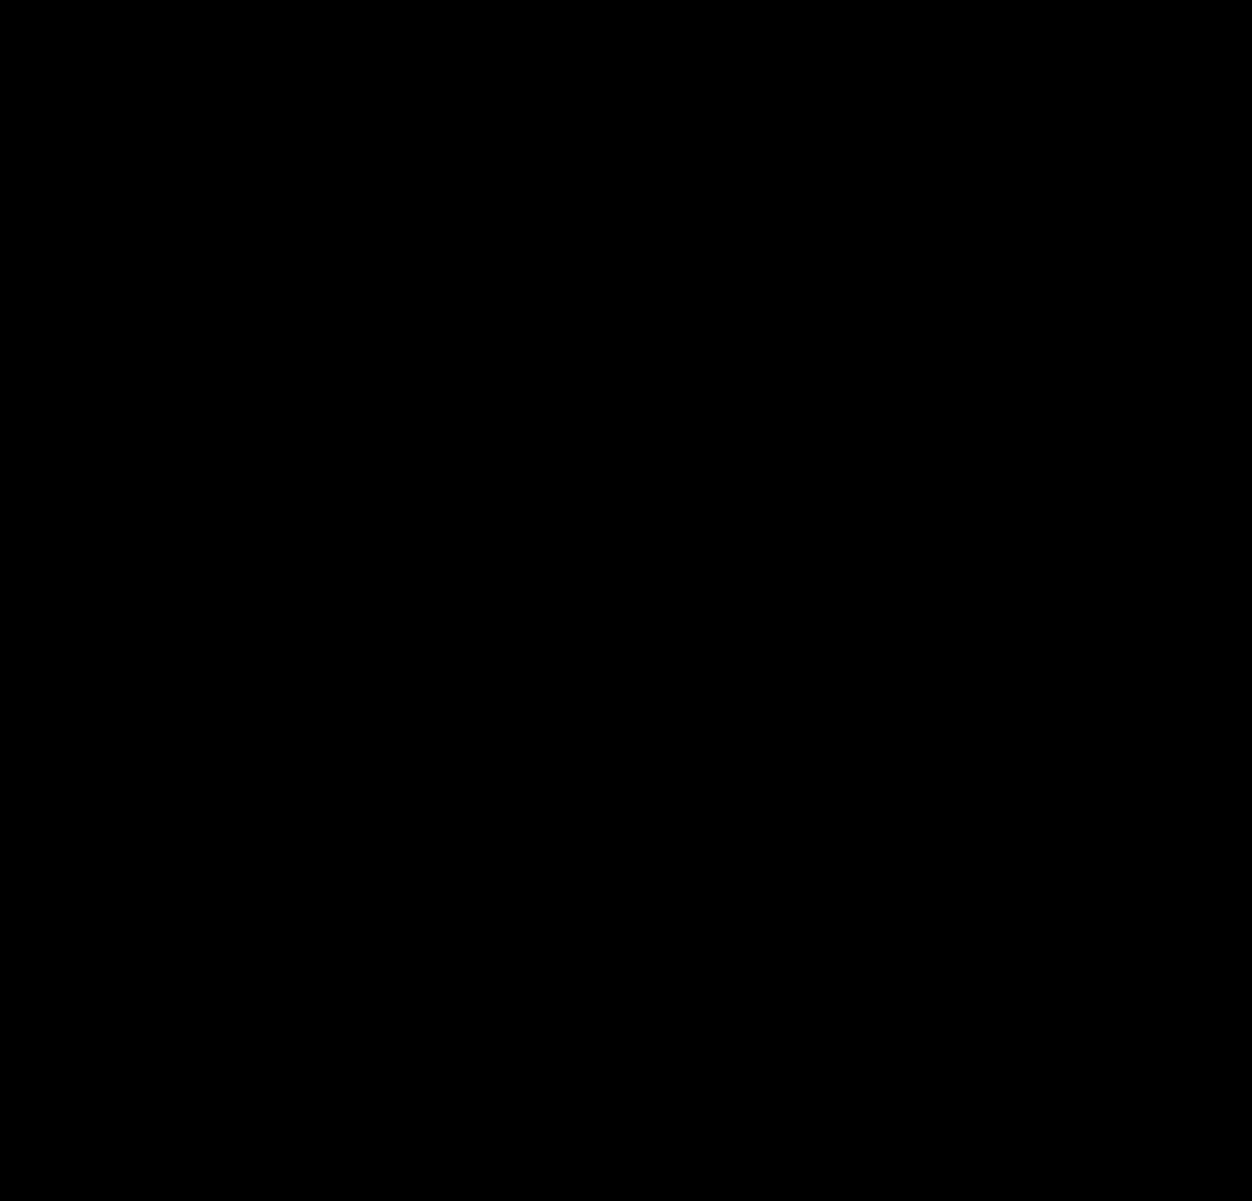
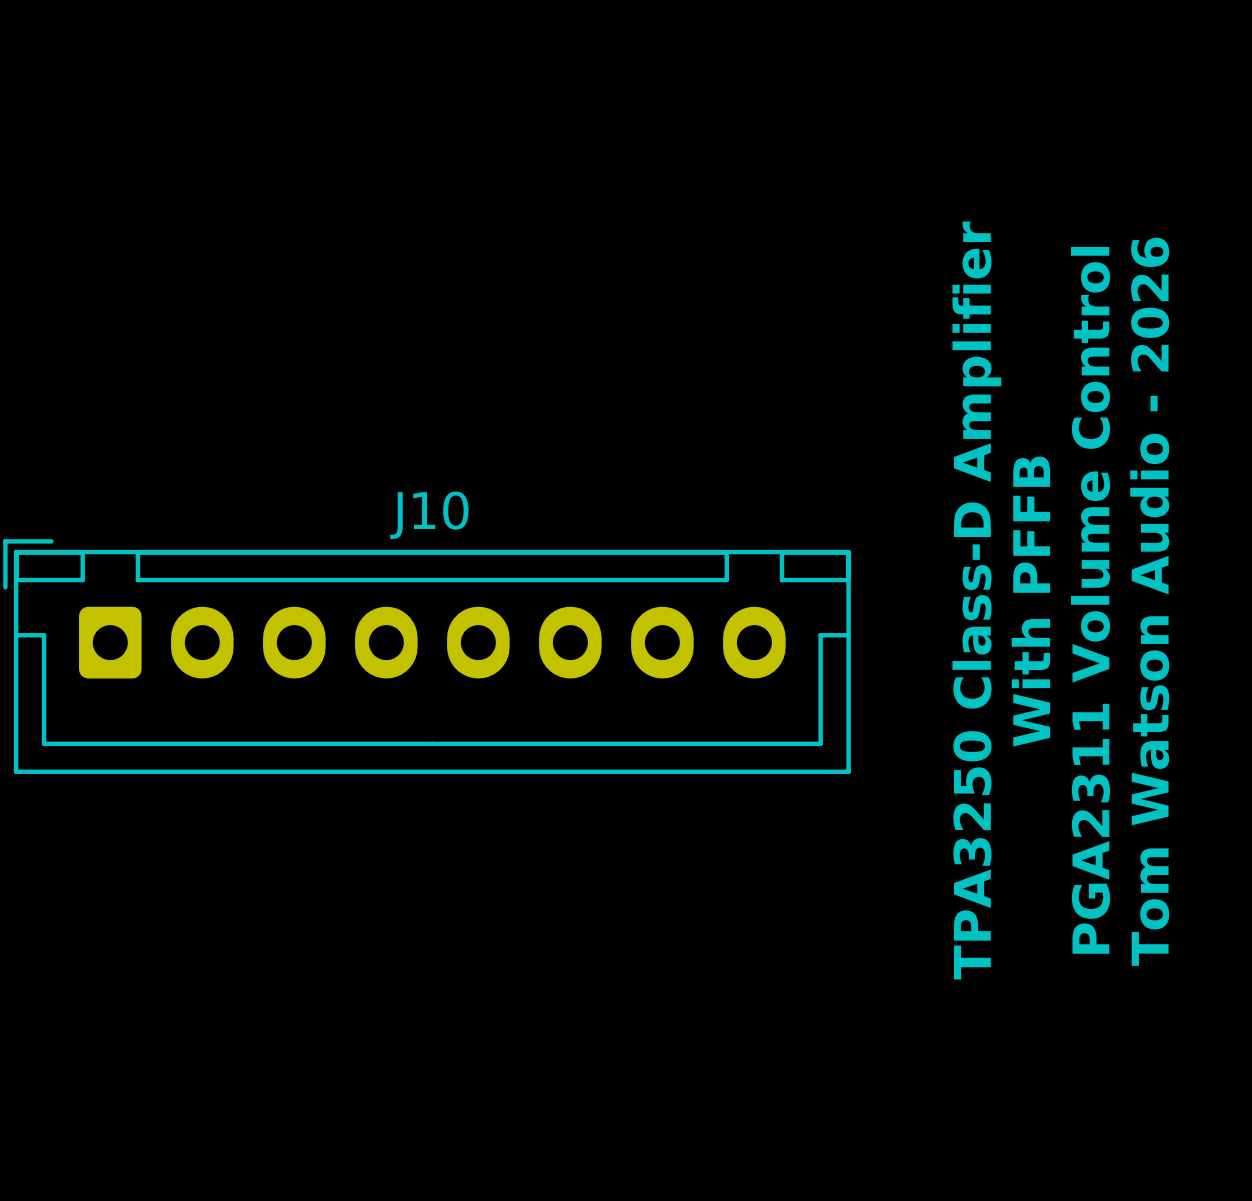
text: none -> TPA3250 Class-D Amplifier (976, 600)
text: none -> PGA2311 Volume Control (1090, 600)
text: none -> With PFFB (1030, 601)
text: none -> Tom Watson Audio - 2026 (1149, 601)
J10: none -> (427, 656)

